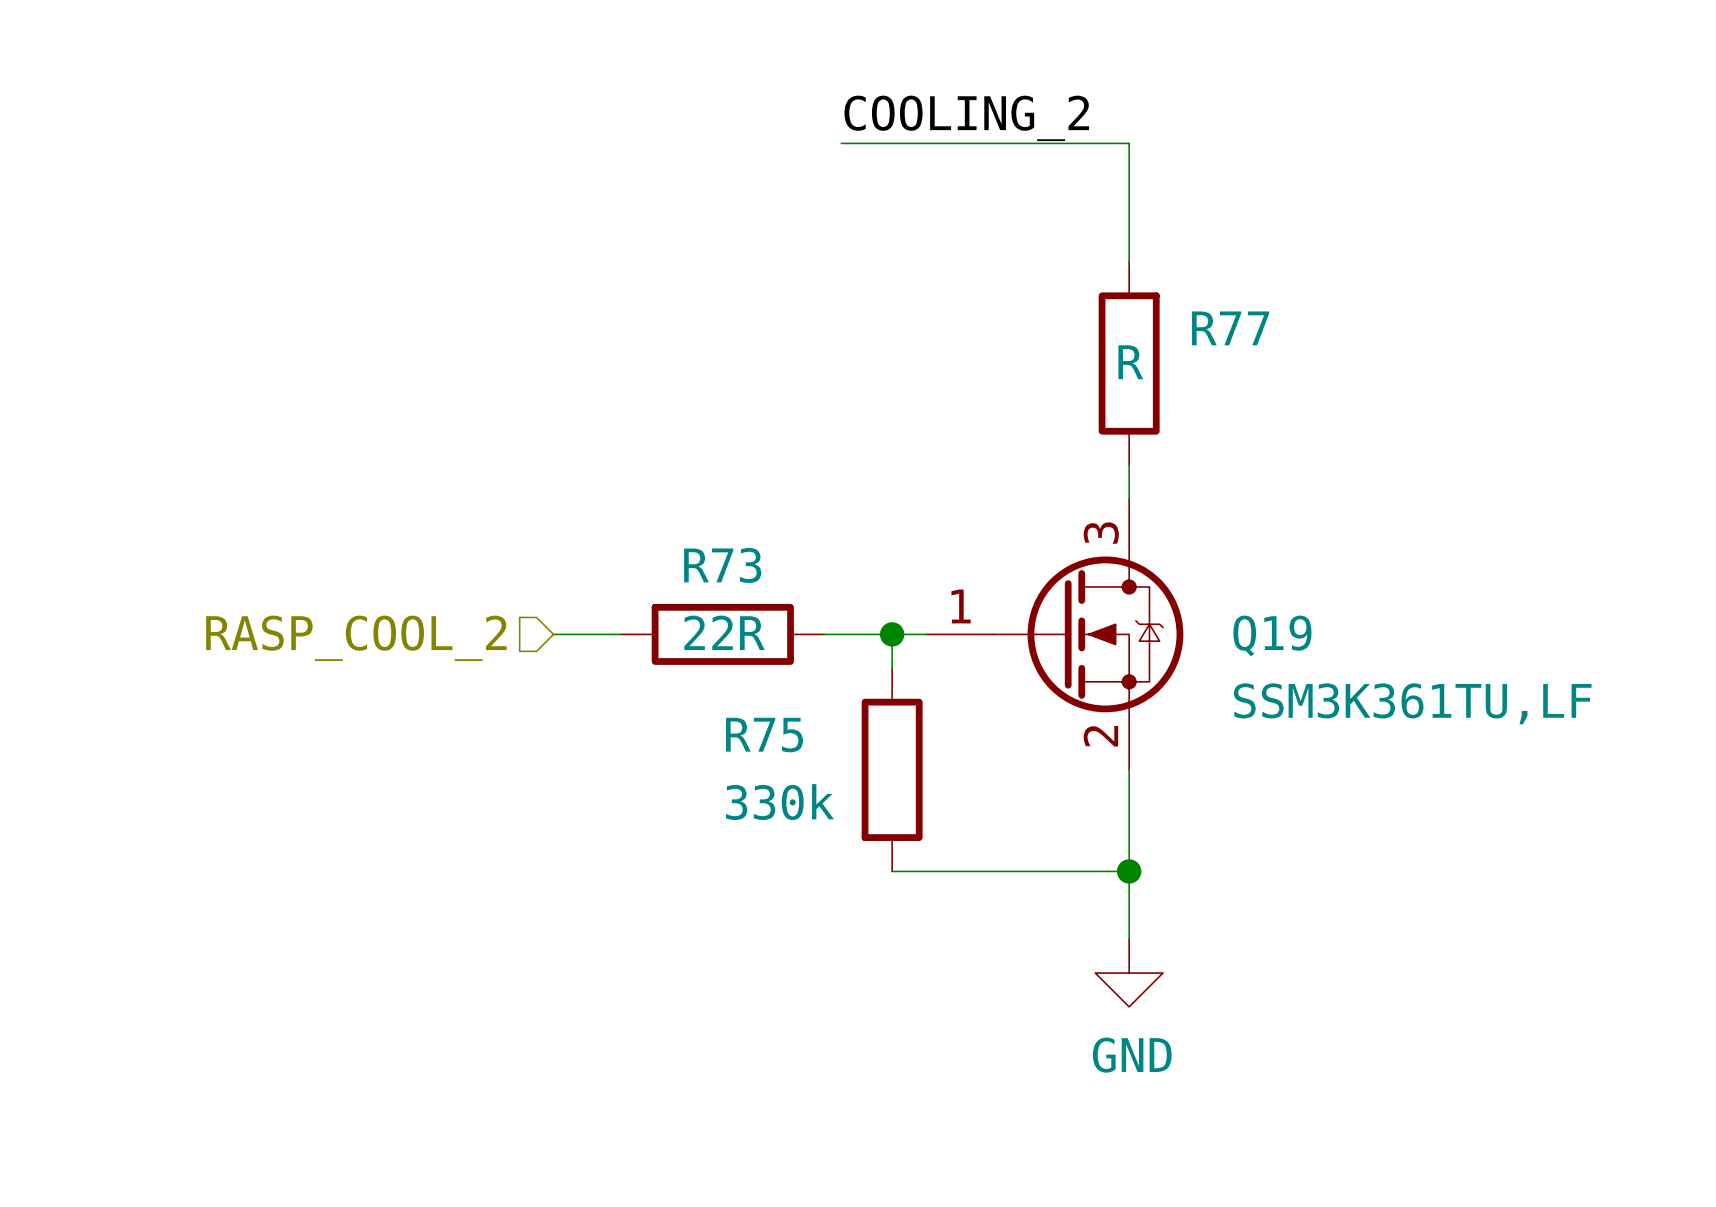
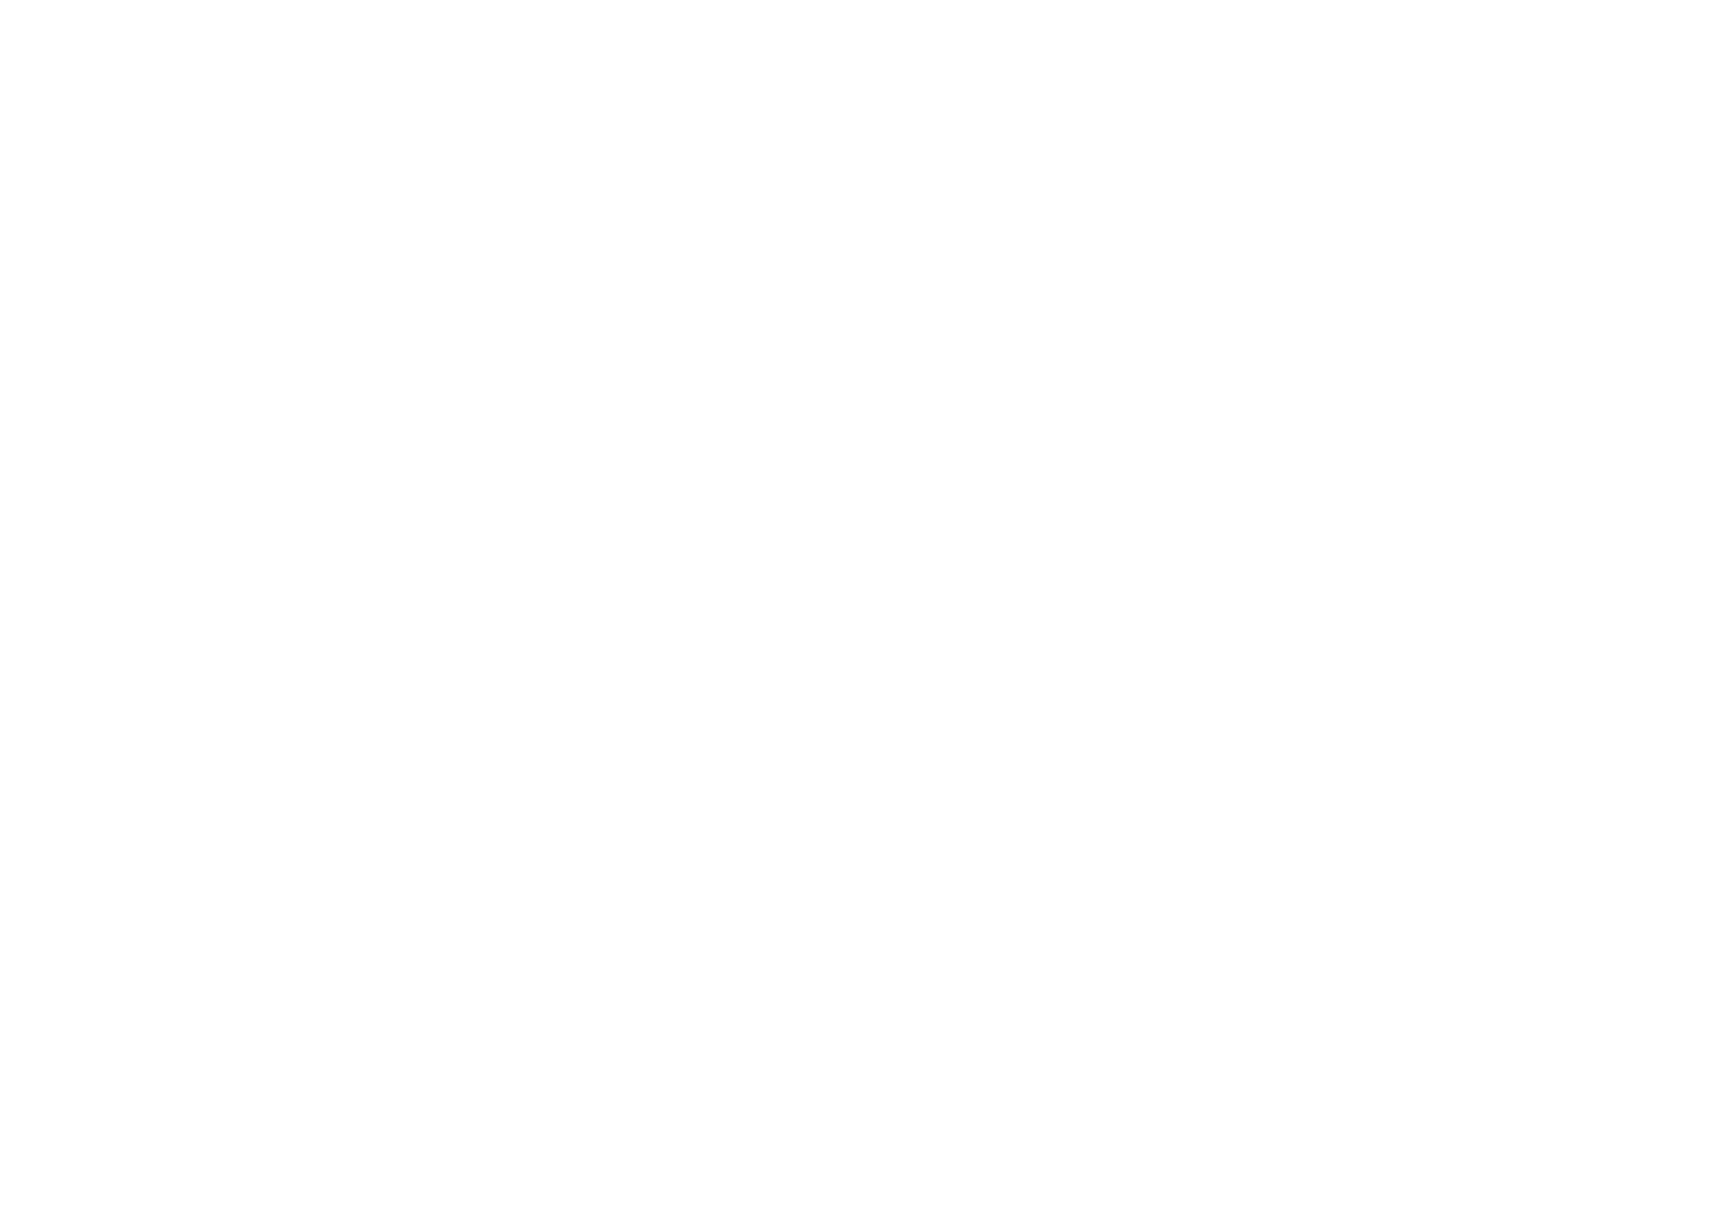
label: COOLING_2 (966, 118) -> none
wire: (841, 143) (1129, 143) (1129, 261) -> none
R77: R (1129, 363) -> none
wire: (1129, 465) (1129, 498) -> none
wire: (553, 634) (621, 634) -> none
R73: 22R (722, 634) -> none
wire: (824, 634) (925, 634) -> none
wire: (892, 634) (892, 668) -> none
junction: (892, 634) -> none
Q19: SSM3K361TU,LF (1054, 634) -> none
hierarchical label: RASP_COOL_2 (356, 638) -> none
R75: 330k (892, 769) -> none
wire: (1129, 769) (1129, 939) -> none
wire: (892, 871) (1129, 871) -> none
junction: (1129, 871) -> none
power symbol: GND (1129, 973) -> none

